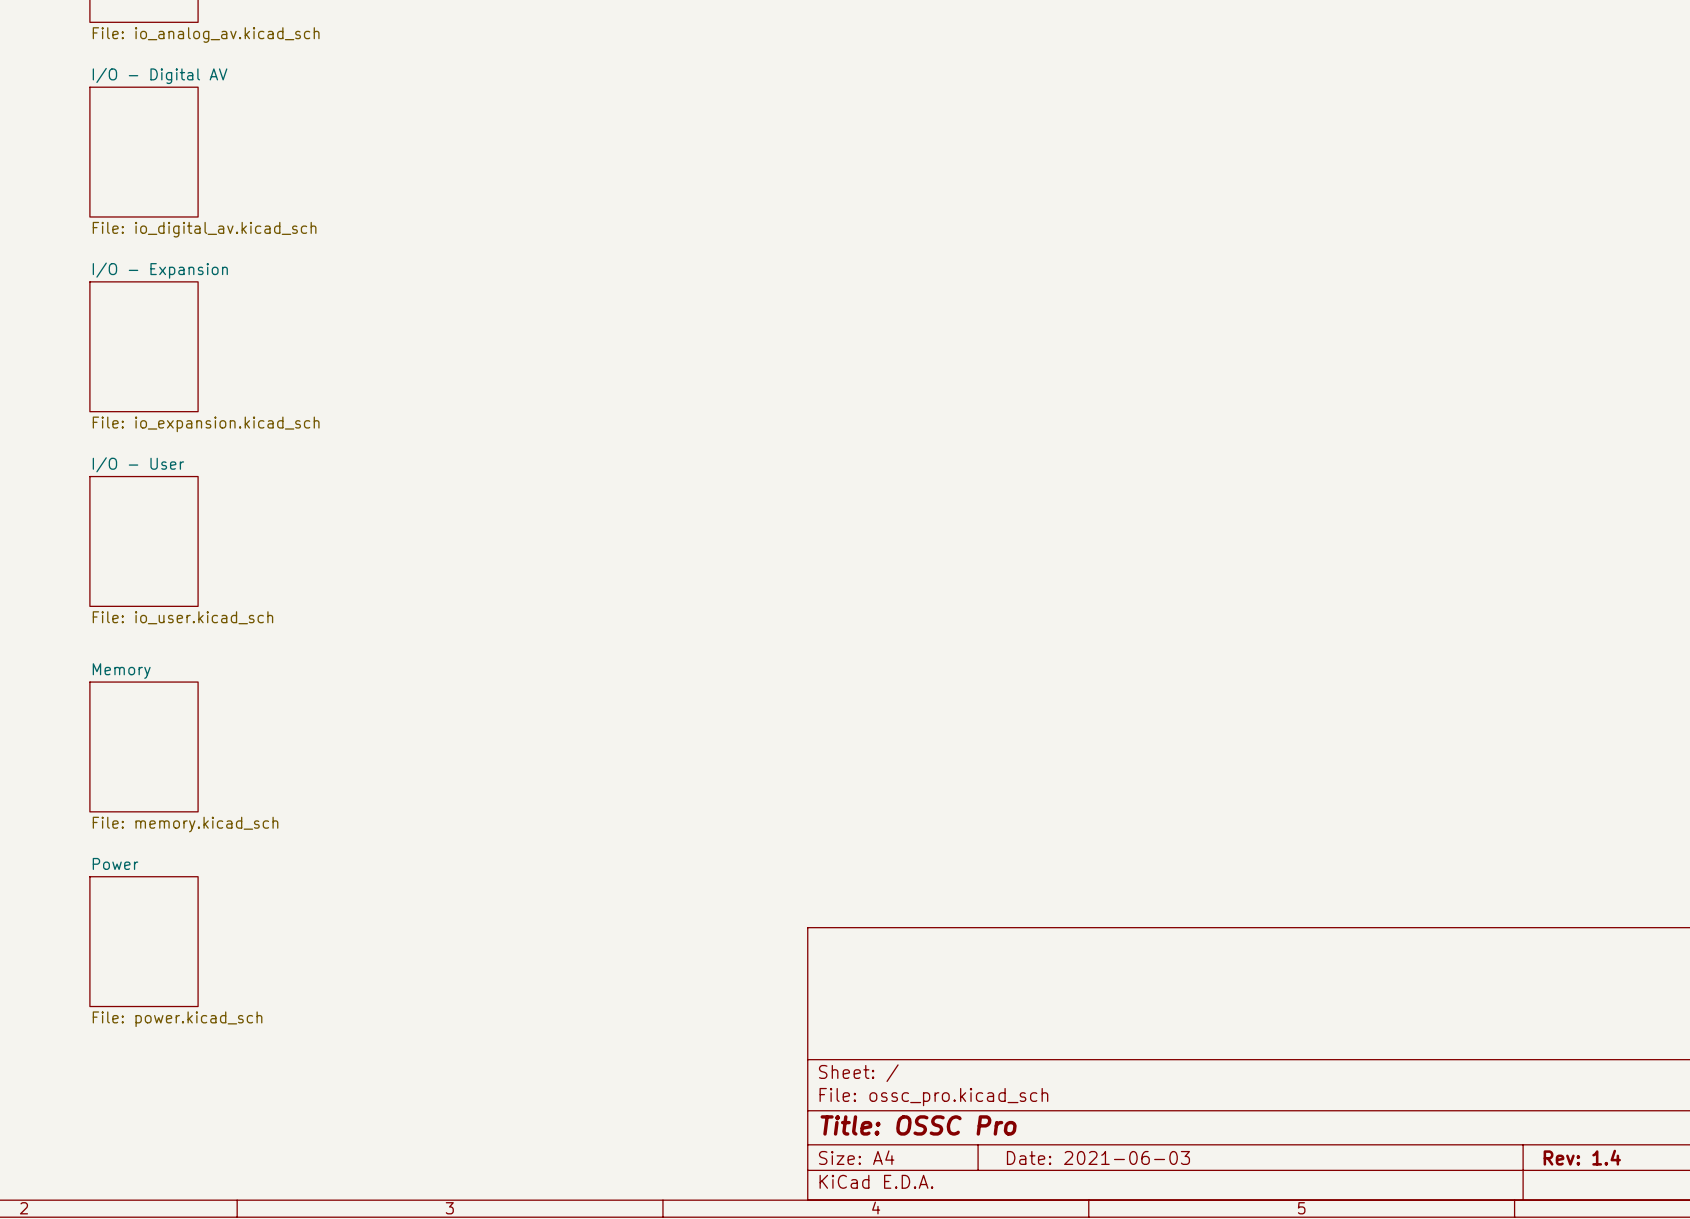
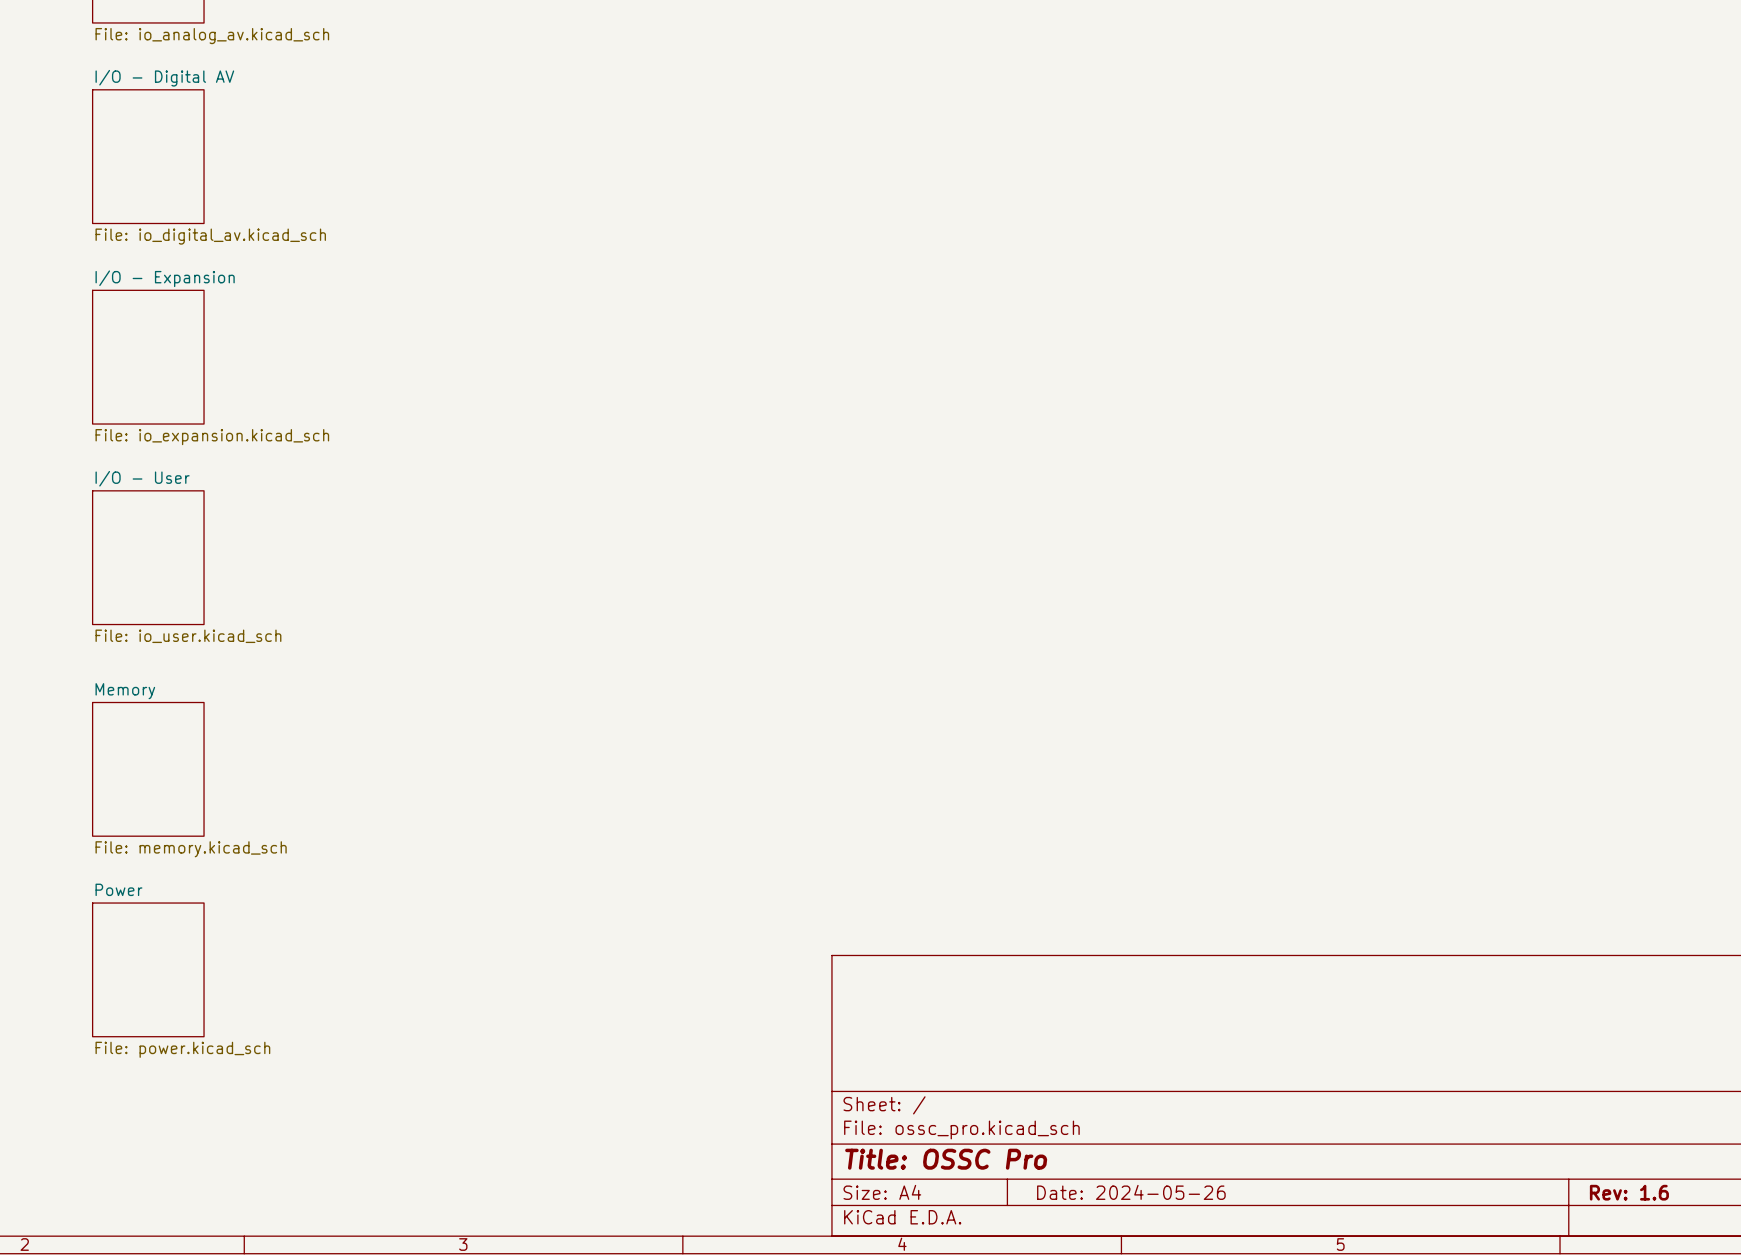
title block: Date: 2021-06-03 (1098, 1157) -> Date: 2024-05-26 (1131, 1192)
title block: Rev: 1.4 (1582, 1157) -> Rev: 1.6 (1629, 1192)

